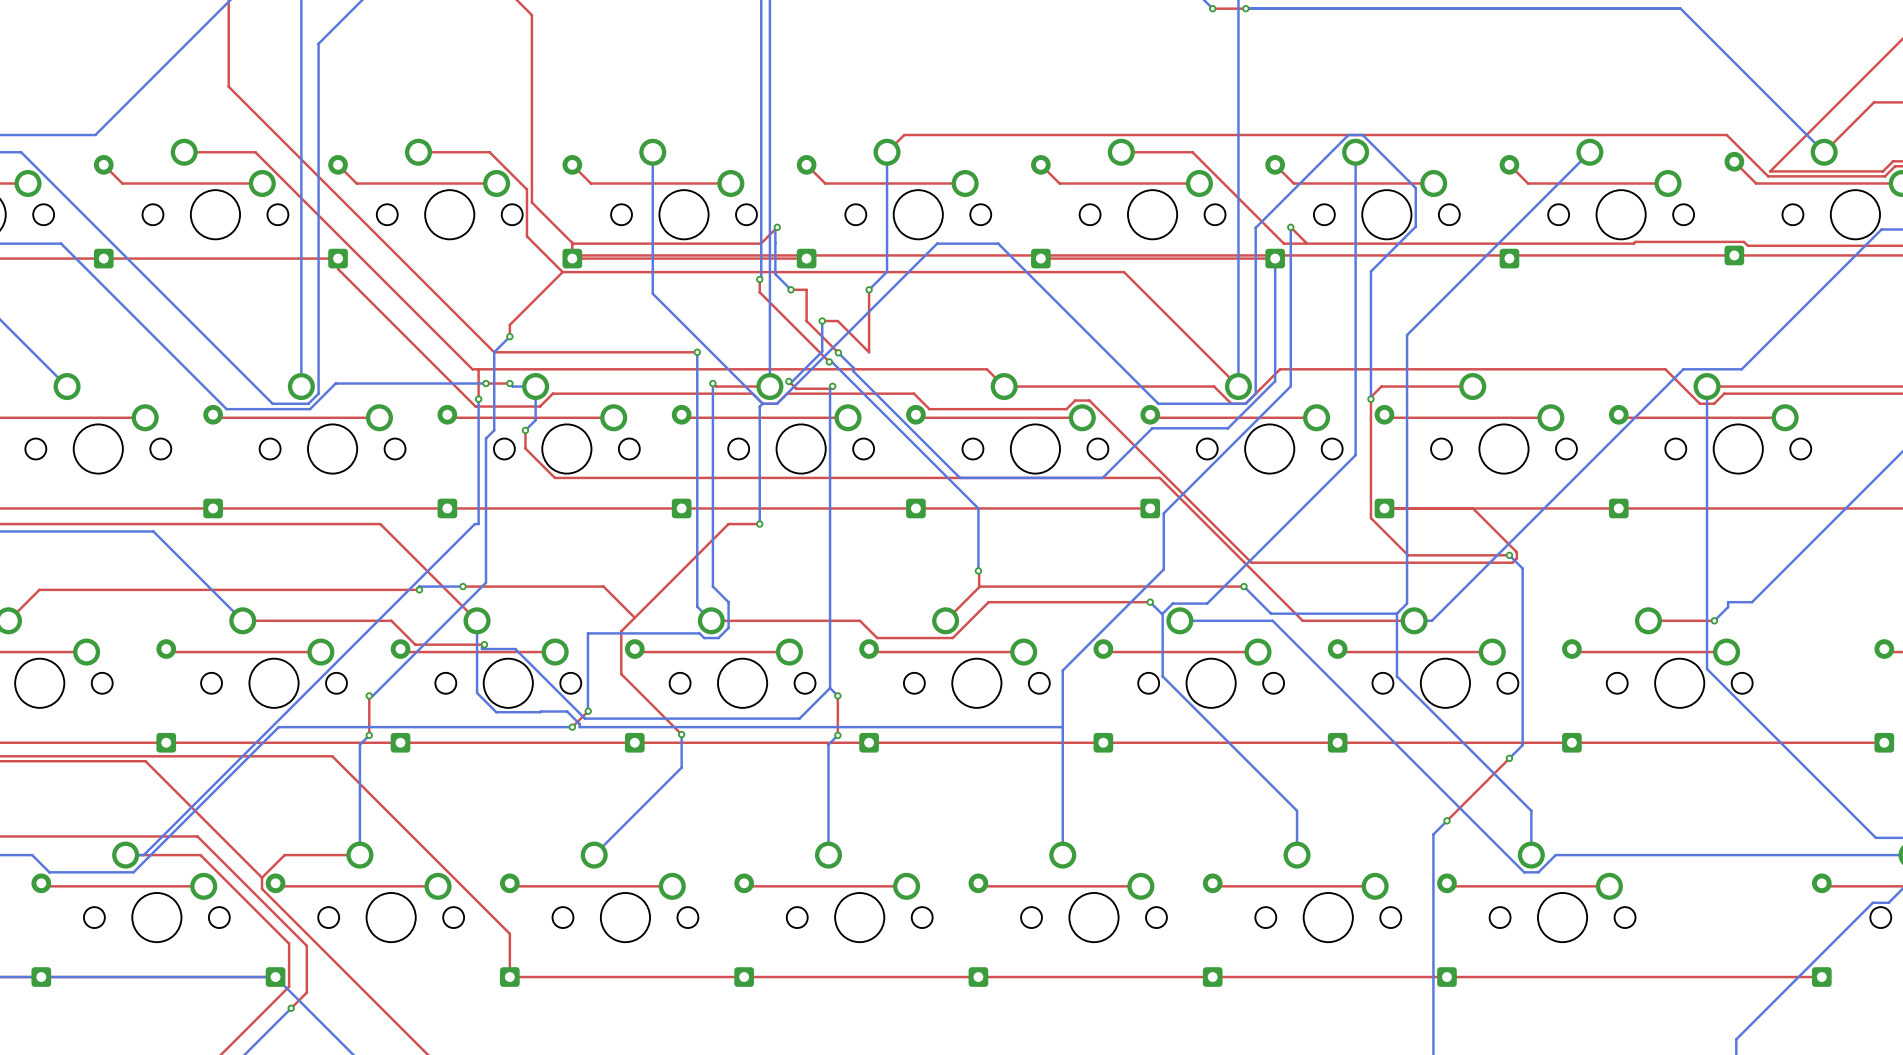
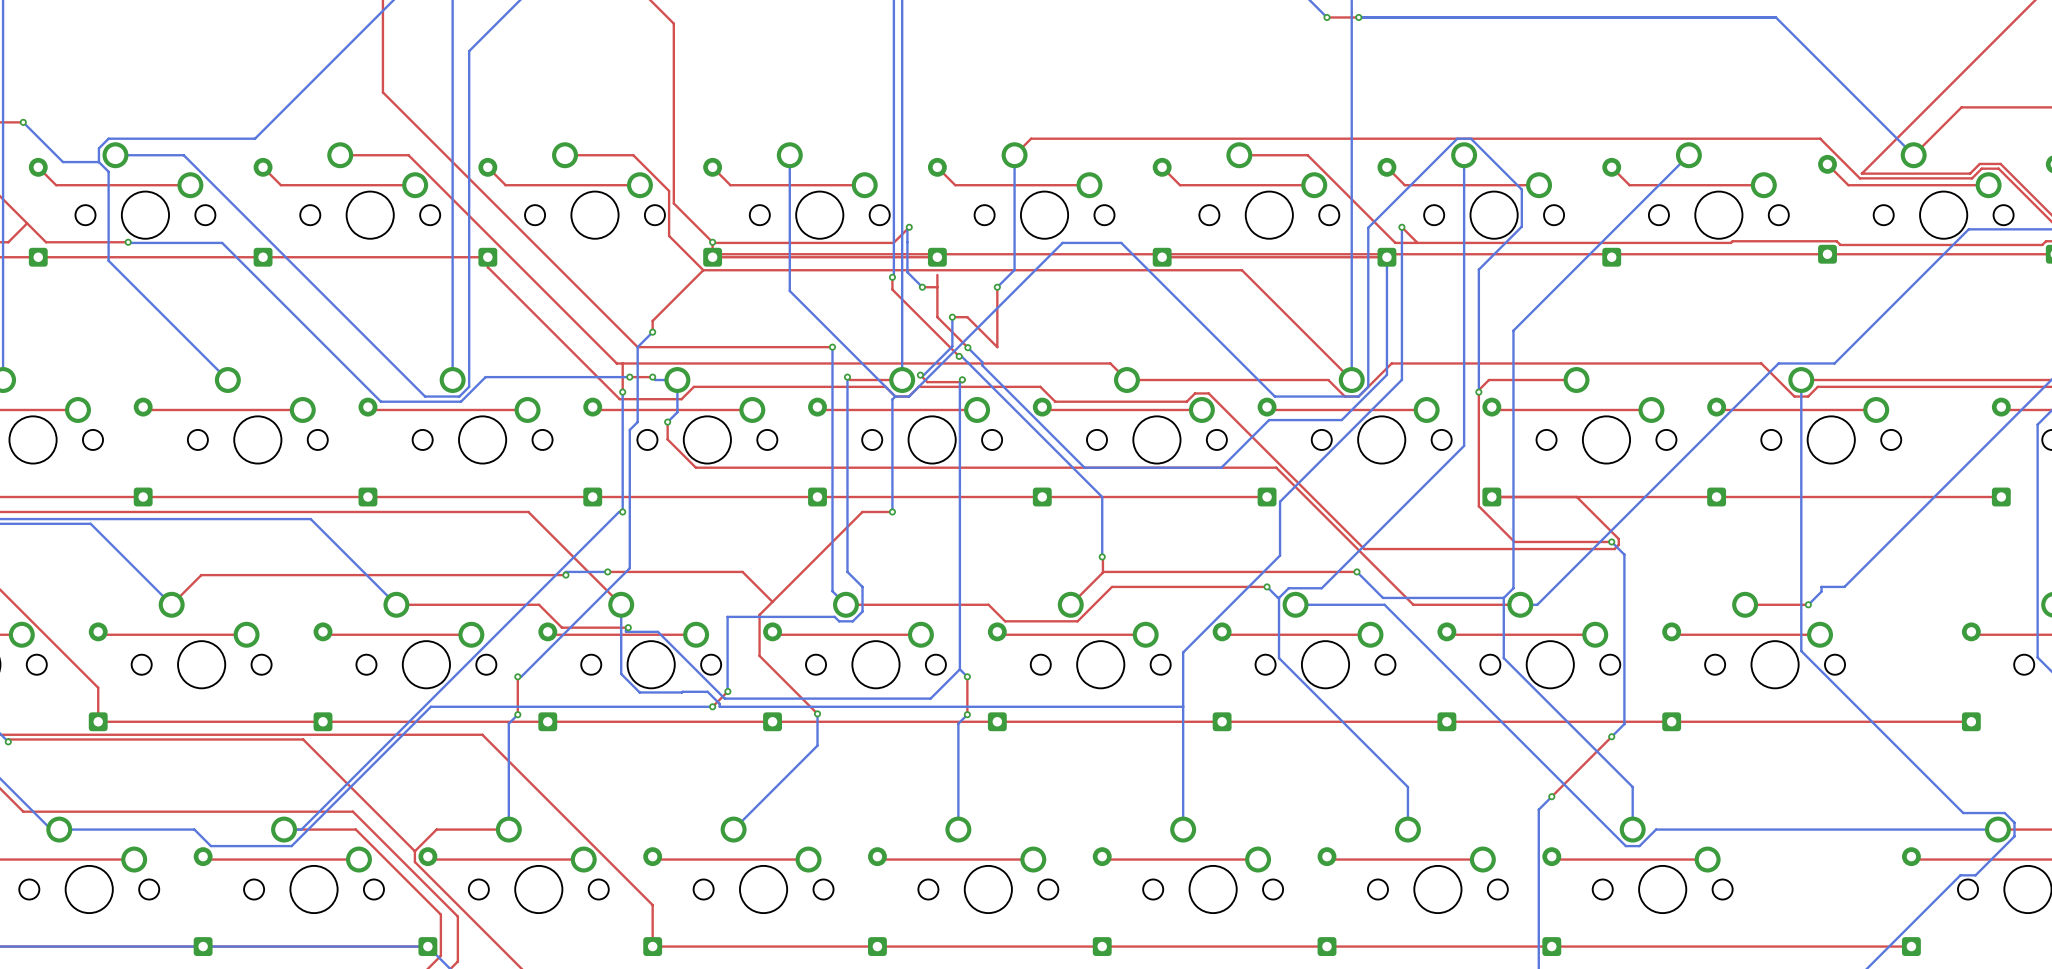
via: none -> (712, 242)
top track: none -> (937, 274) (937, 287)
via: none -> (622, 511)

